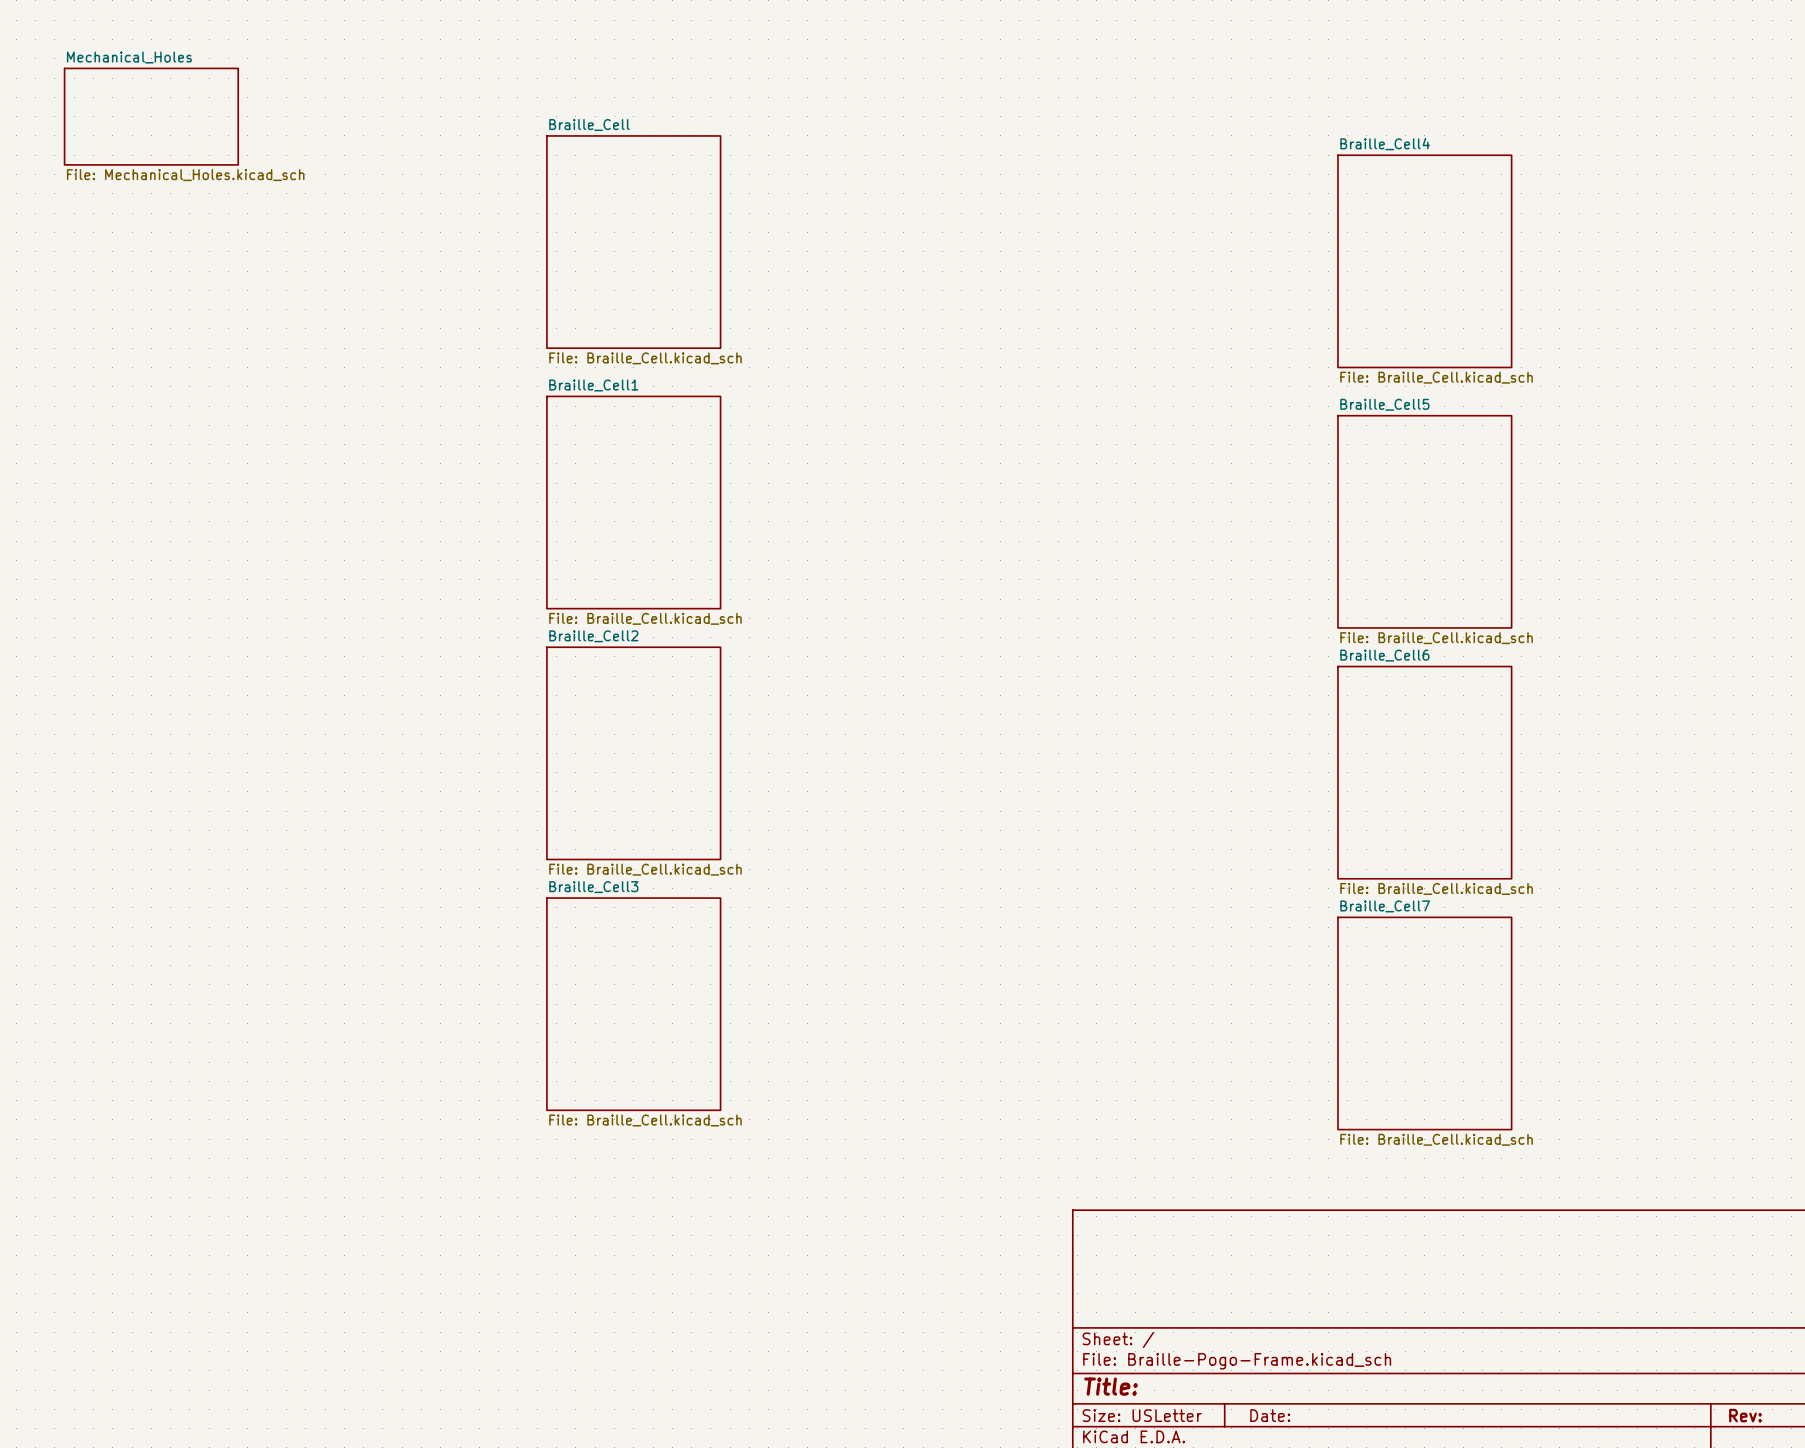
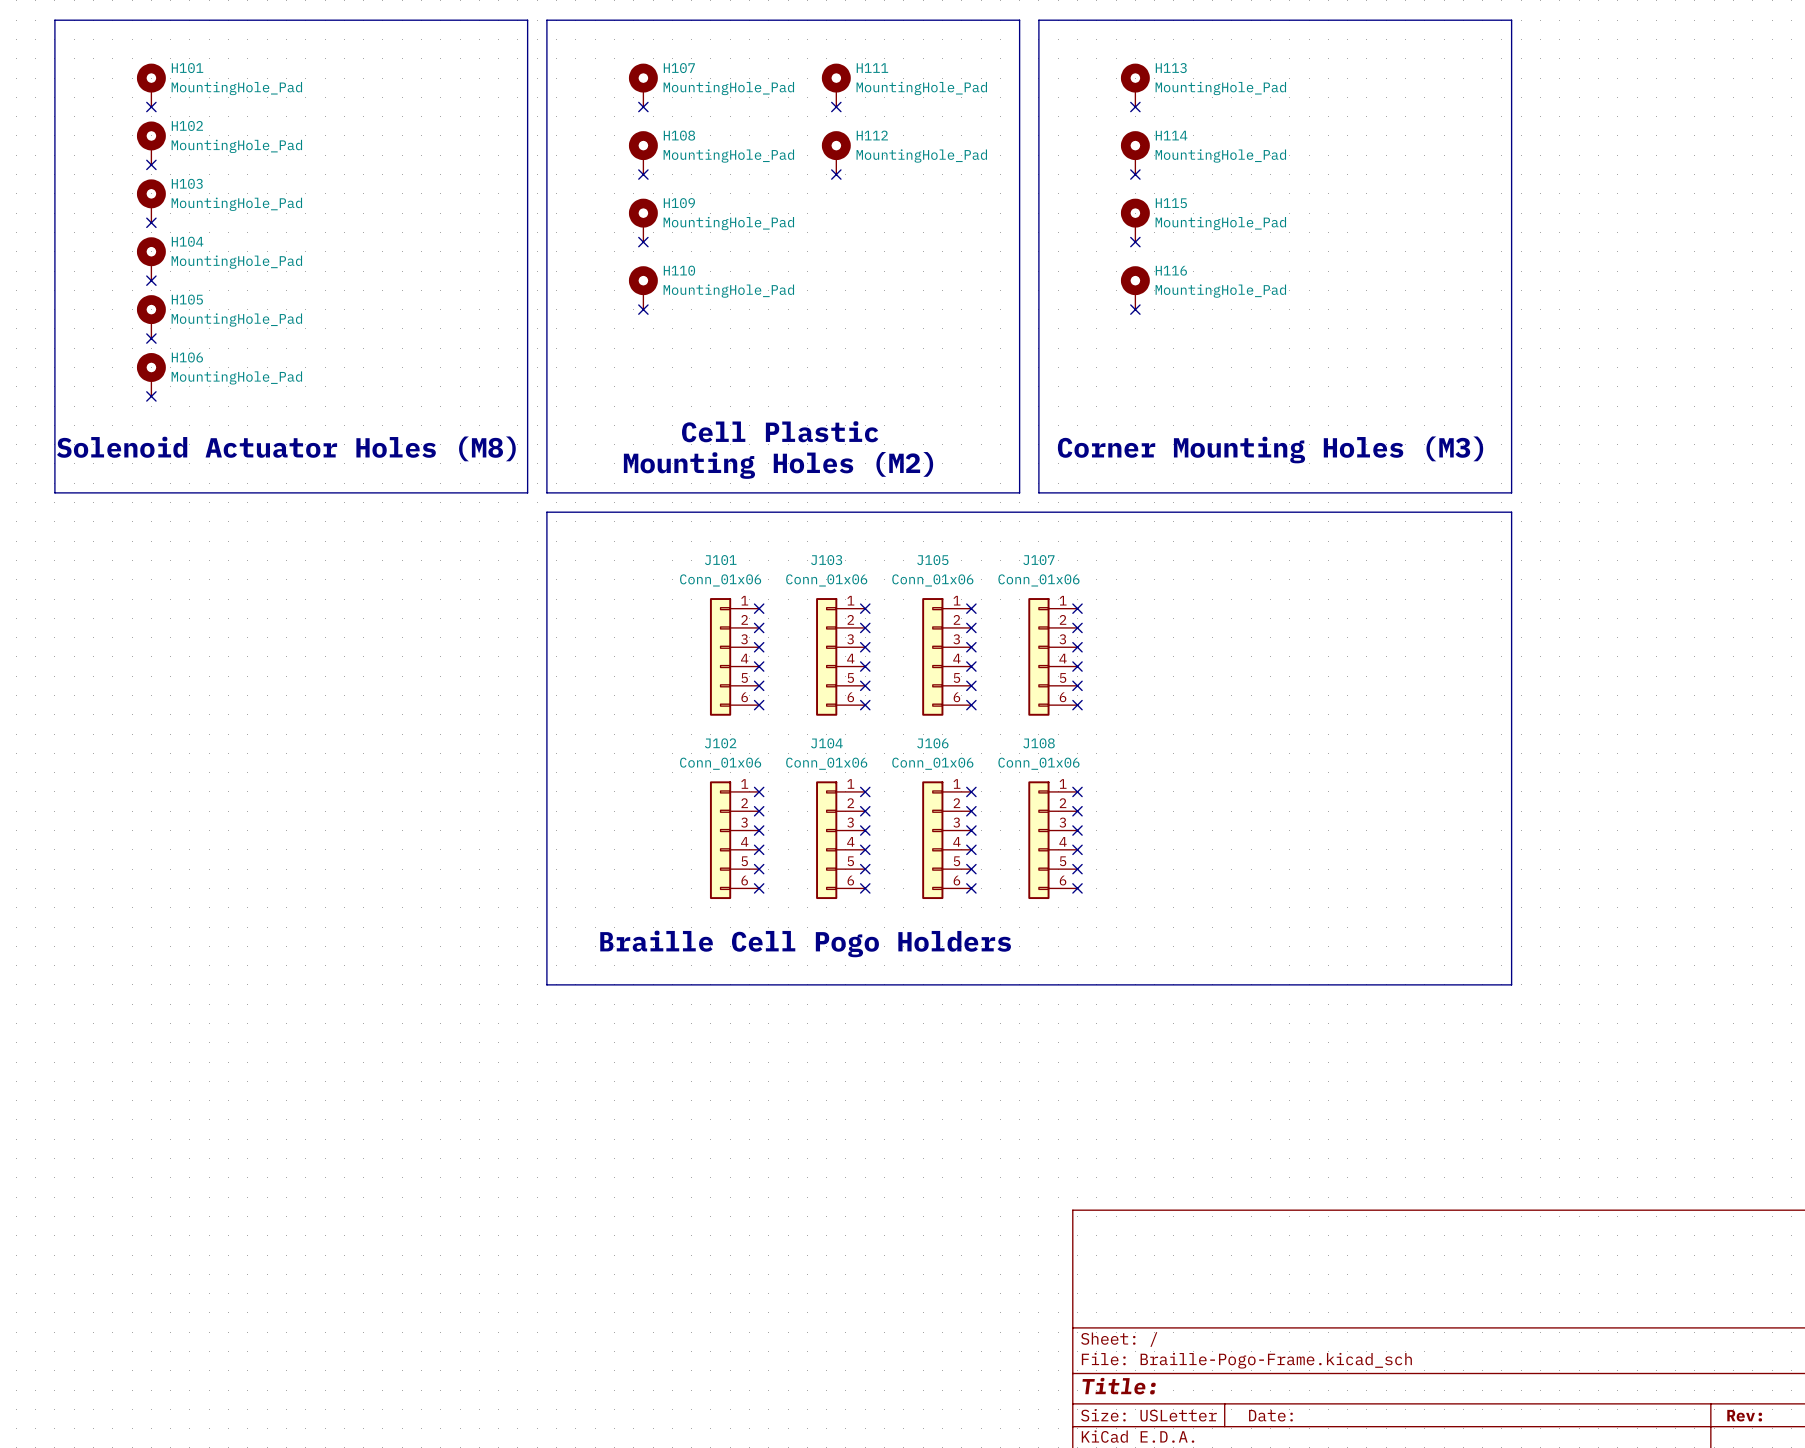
line: none -> (54, 20) (527, 20) (527, 492) (54, 492) (54, 20)
line: none -> (546, 20) (1019, 20) (1019, 492) (546, 492) (546, 20)
line: none -> (1038, 20) (1511, 20) (1511, 492) (1038, 492) (1038, 20)
H101: none -> MountingHole_Pad (151, 85)
H107: none -> MountingHole_Pad (643, 85)
H111: none -> MountingHole_Pad (836, 85)
H113: none -> MountingHole_Pad (1135, 85)
no-connect mark: none -> (151, 107)
no-connect mark: none -> (643, 107)
no-connect mark: none -> (836, 107)
no-connect mark: none -> (1135, 107)
sheet Mechanical_Holes: File: Mechanical_Holes.kicad_sch (151, 116) -> none
H102: none -> MountingHole_Pad (151, 143)
H108: none -> MountingHole_Pad (643, 152)
H112: none -> MountingHole_Pad (836, 152)
H114: none -> MountingHole_Pad (1135, 152)
no-connect mark: none -> (151, 164)
no-connect mark: none -> (643, 174)
no-connect mark: none -> (836, 174)
no-connect mark: none -> (1135, 174)
H103: none -> MountingHole_Pad (151, 201)
H109: none -> MountingHole_Pad (643, 220)
H115: none -> MountingHole_Pad (1135, 220)
no-connect mark: none -> (151, 222)
sheet Braille_Cell: File: Braille_Cell.kicad_sch (633, 242) -> none
no-connect mark: none -> (643, 242)
no-connect mark: none -> (1135, 242)
H104: none -> MountingHole_Pad (151, 258)
sheet Braille_Cell4: File: Braille_Cell.kicad_sch (1424, 261) -> none
no-connect mark: none -> (151, 280)
H110: none -> MountingHole_Pad (643, 287)
H116: none -> MountingHole_Pad (1135, 287)
no-connect mark: none -> (643, 309)
no-connect mark: none -> (1135, 309)
H105: none -> MountingHole_Pad (151, 316)
no-connect mark: none -> (151, 338)
H106: none -> MountingHole_Pad (151, 374)
no-connect mark: none -> (151, 396)
text: none -> Cell Plastic (780, 431)
text: none -> Solenoid Actuator Holes (M8) (286, 448)
text: none -> Corner Mounting Holes (M3) (1270, 449)
text: none -> Mounting Holes (M2) (778, 465)
sheet Braille_Cell1: File: Braille_Cell.kicad_sch (633, 502) -> none
line: none -> (546, 512) (546, 984) (1511, 984) (1511, 512) (546, 512)
sheet Braille_Cell5: File: Braille_Cell.kicad_sch (1424, 521) -> none
no-connect mark: none -> (759, 608)
no-connect mark: none -> (865, 608)
no-connect mark: none -> (971, 608)
no-connect mark: none -> (1077, 608)
no-connect mark: none -> (759, 627)
no-connect mark: none -> (865, 627)
no-connect mark: none -> (971, 627)
no-connect mark: none -> (1077, 627)
no-connect mark: none -> (759, 647)
no-connect mark: none -> (865, 647)
no-connect mark: none -> (971, 647)
no-connect mark: none -> (1077, 647)
J101: none -> Conn_01x06 (734, 656)
J103: none -> Conn_01x06 (840, 656)
J105: none -> Conn_01x06 (946, 656)
J107: none -> Conn_01x06 (1052, 656)
no-connect mark: none -> (759, 666)
no-connect mark: none -> (865, 666)
no-connect mark: none -> (971, 666)
no-connect mark: none -> (1077, 666)
no-connect mark: none -> (759, 685)
no-connect mark: none -> (865, 685)
no-connect mark: none -> (971, 685)
no-connect mark: none -> (1077, 685)
no-connect mark: none -> (759, 705)
no-connect mark: none -> (865, 705)
no-connect mark: none -> (971, 705)
no-connect mark: none -> (1077, 705)
sheet Braille_Cell2: File: Braille_Cell.kicad_sch (633, 753) -> none
sheet Braille_Cell6: File: Braille_Cell.kicad_sch (1424, 772) -> none
no-connect mark: none -> (759, 791)
no-connect mark: none -> (865, 791)
no-connect mark: none -> (971, 791)
no-connect mark: none -> (1077, 791)
no-connect mark: none -> (759, 811)
no-connect mark: none -> (865, 811)
no-connect mark: none -> (971, 811)
no-connect mark: none -> (1077, 811)
no-connect mark: none -> (759, 830)
no-connect mark: none -> (865, 830)
no-connect mark: none -> (971, 830)
no-connect mark: none -> (1077, 830)
J102: none -> Conn_01x06 (734, 840)
J104: none -> Conn_01x06 (840, 840)
J106: none -> Conn_01x06 (946, 840)
J108: none -> Conn_01x06 (1052, 840)
no-connect mark: none -> (759, 849)
no-connect mark: none -> (865, 849)
no-connect mark: none -> (971, 849)
no-connect mark: none -> (1077, 849)
no-connect mark: none -> (759, 869)
no-connect mark: none -> (865, 869)
no-connect mark: none -> (971, 869)
no-connect mark: none -> (1077, 869)
no-connect mark: none -> (759, 888)
no-connect mark: none -> (865, 888)
no-connect mark: none -> (971, 888)
no-connect mark: none -> (1077, 888)
text: none -> Braille Cell Pogo Holders (805, 943)
sheet Braille_Cell3: File: Braille_Cell.kicad_sch (633, 1004) -> none
sheet Braille_Cell7: File: Braille_Cell.kicad_sch (1424, 1023) -> none

